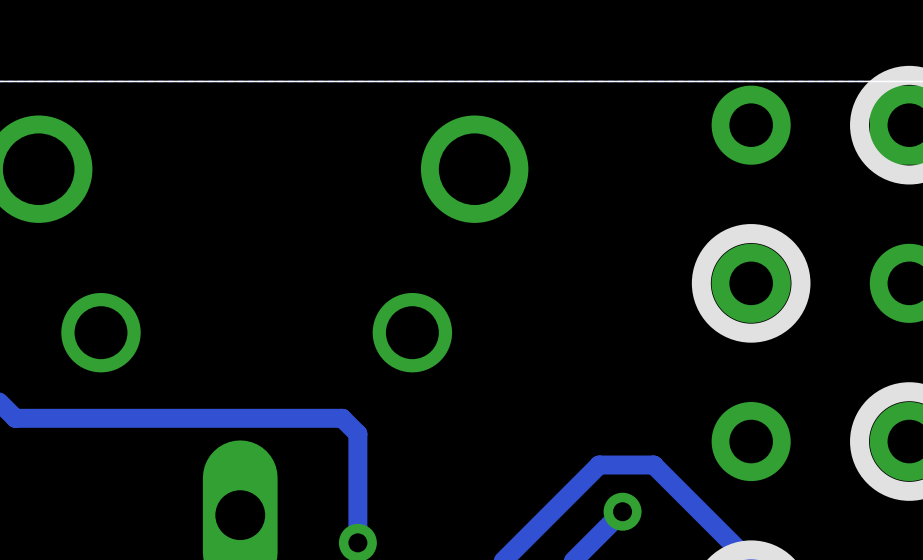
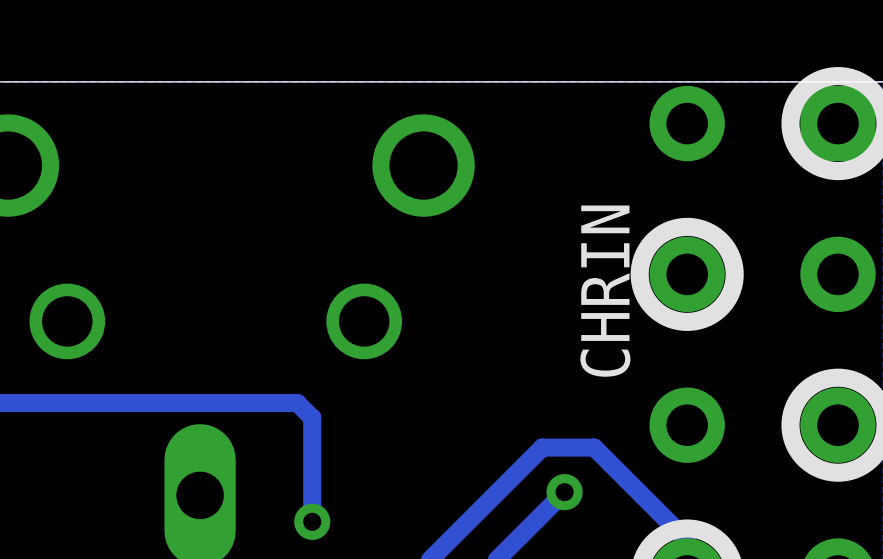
text: none -> CHRIN (605, 291)

